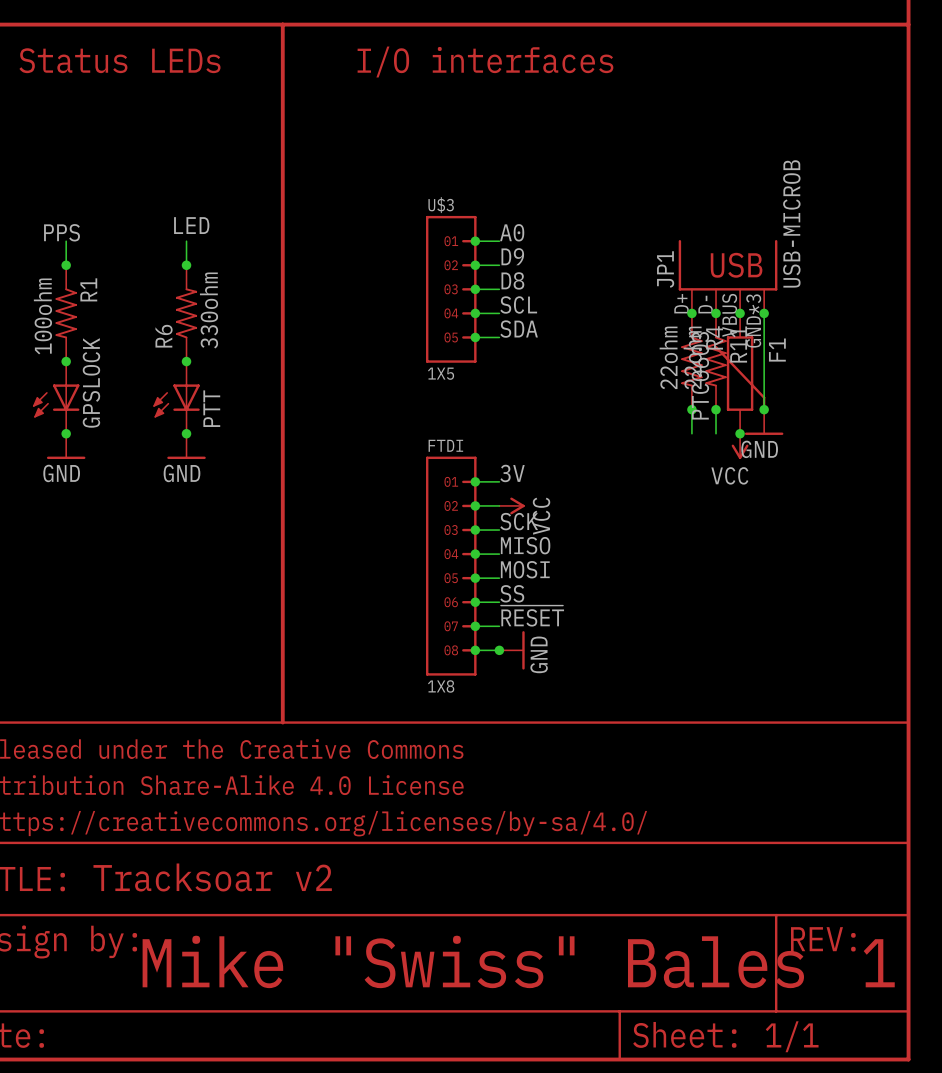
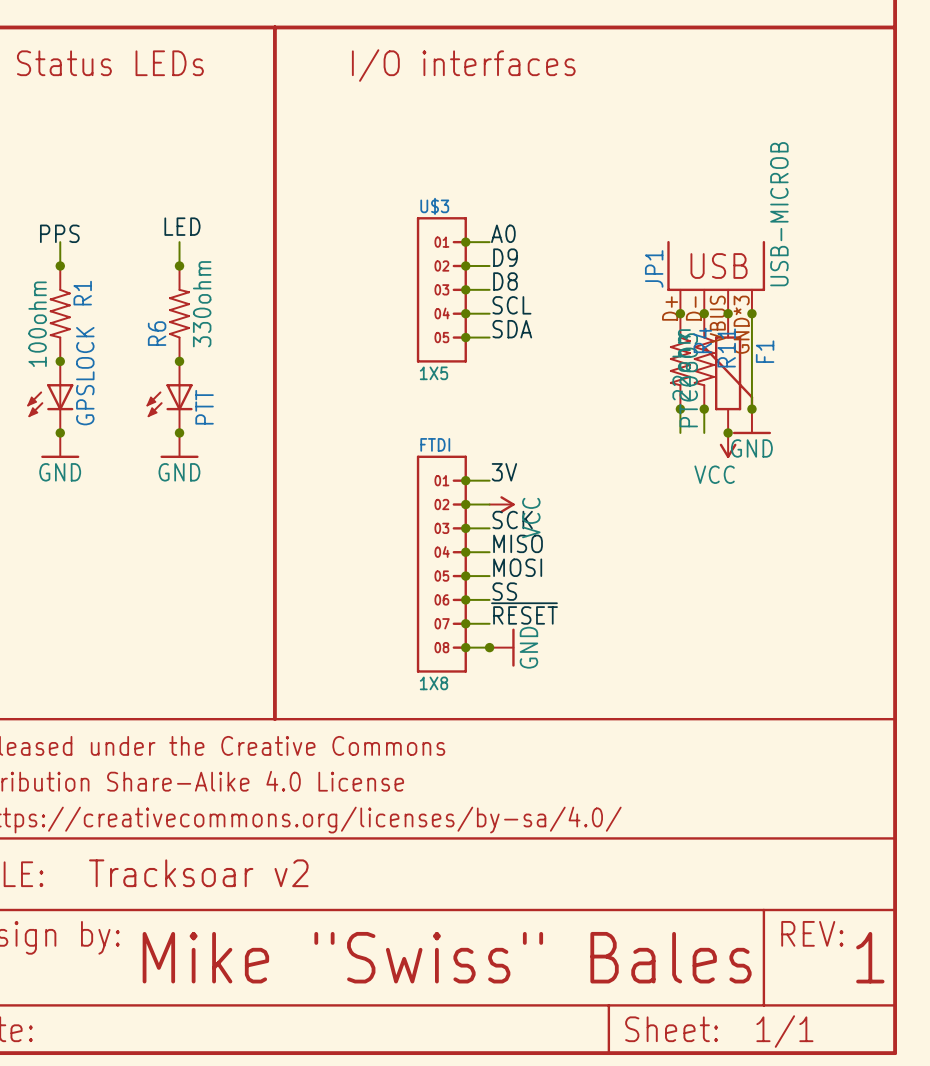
R4 value: 22ohm (668, 357) -> none

